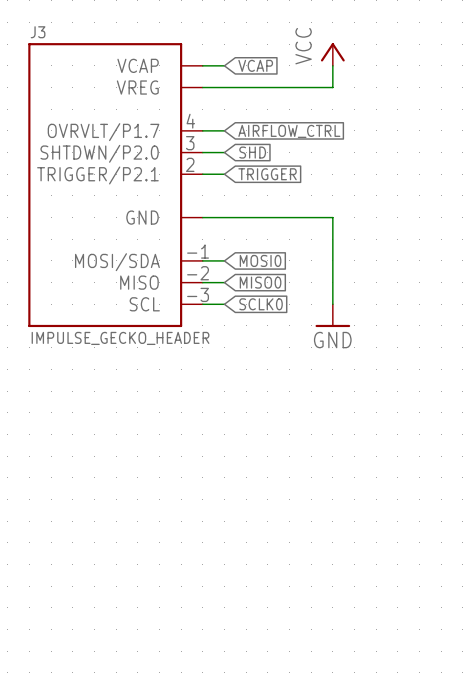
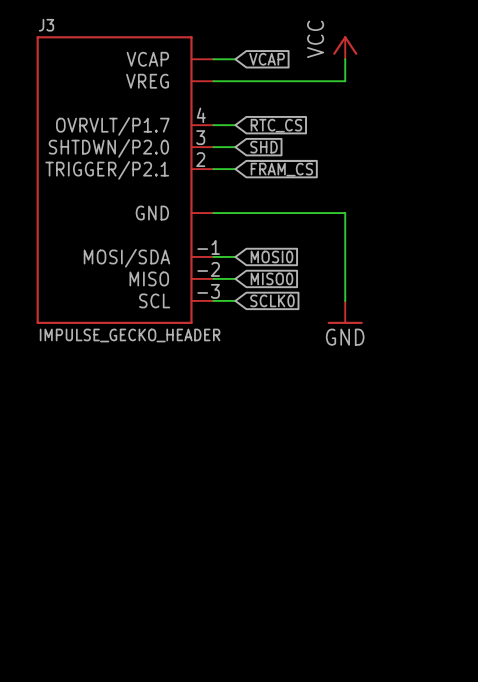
global label: AIRFLOW_CTRL (289, 131) -> RTC_CS (276, 125)
global label: TRIGGER (267, 174) -> ~{FRAM_CS} (281, 168)

